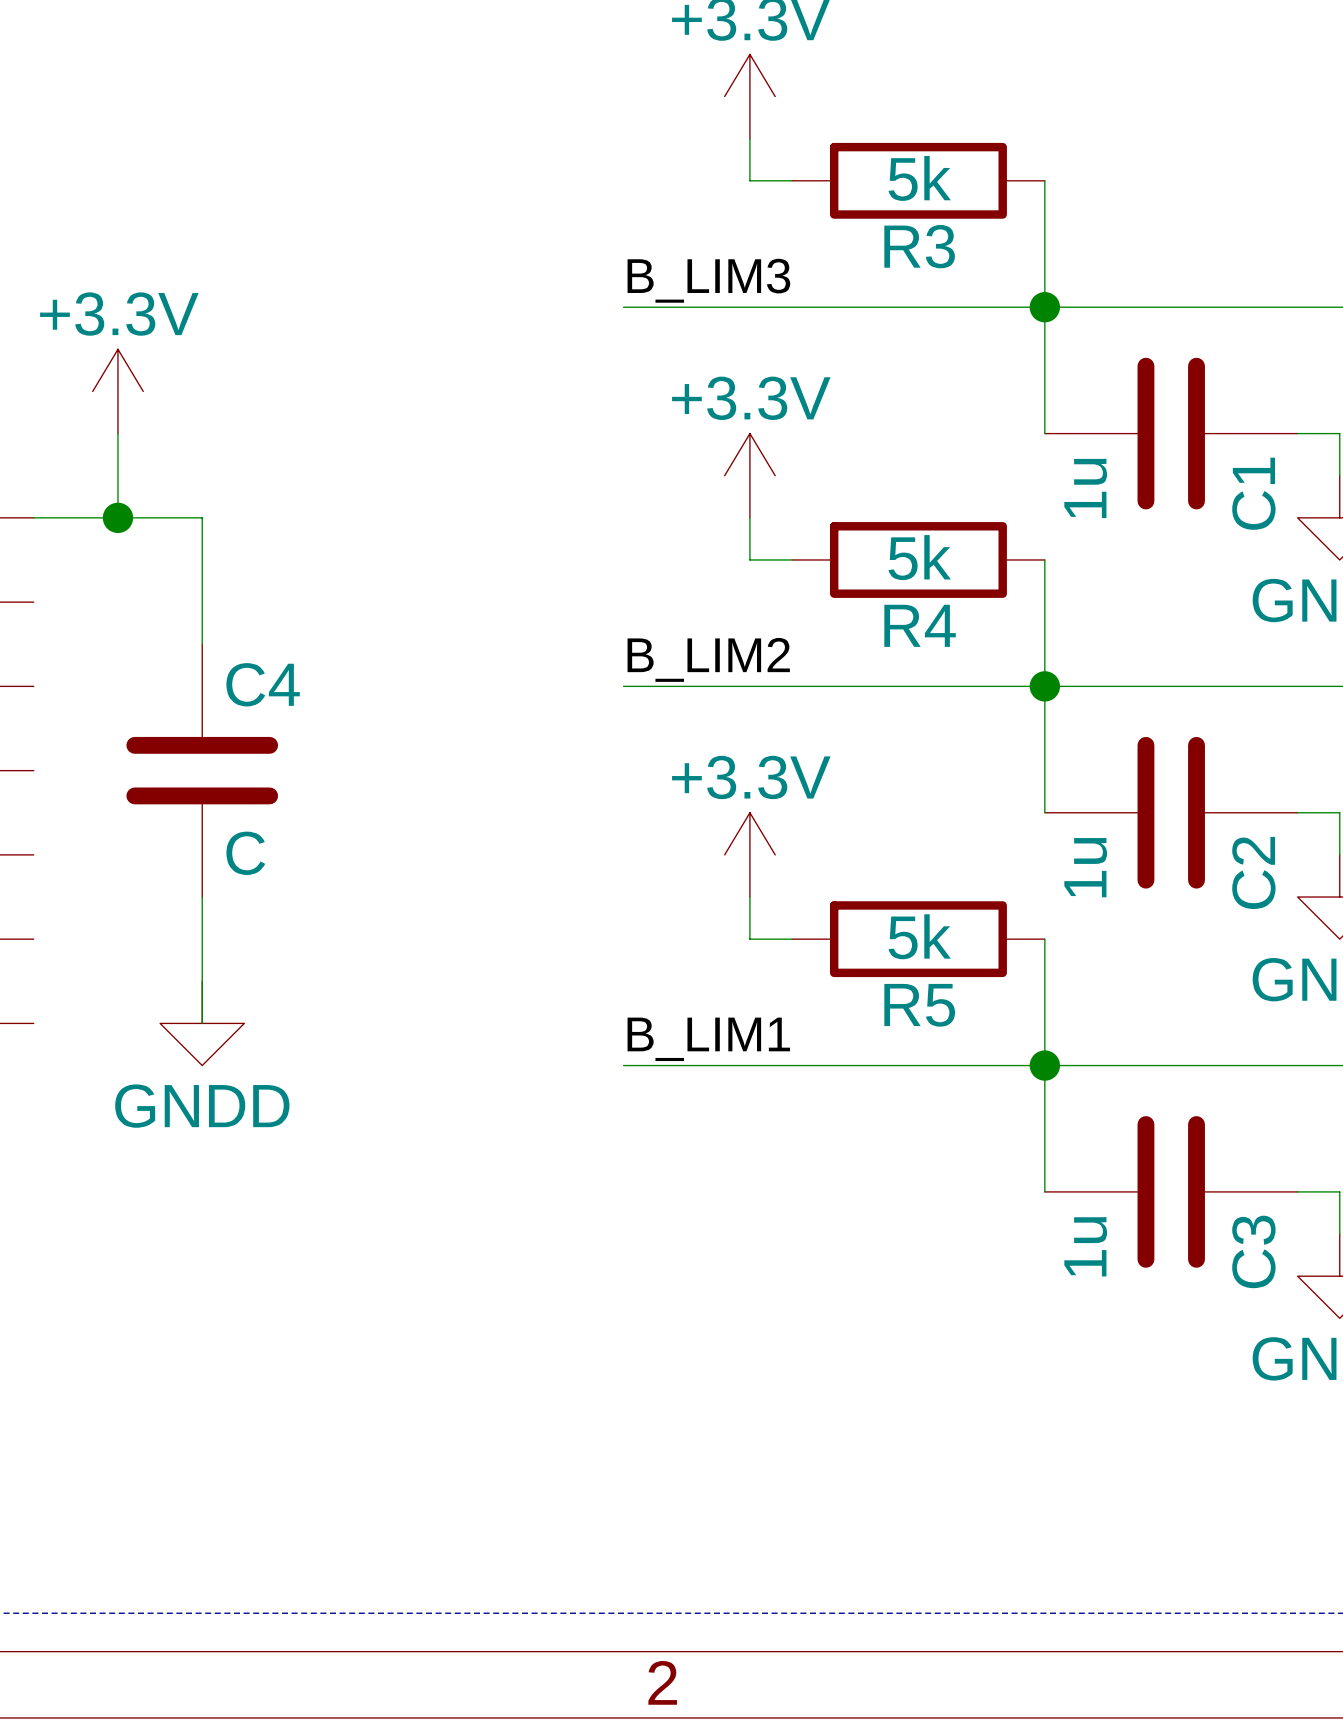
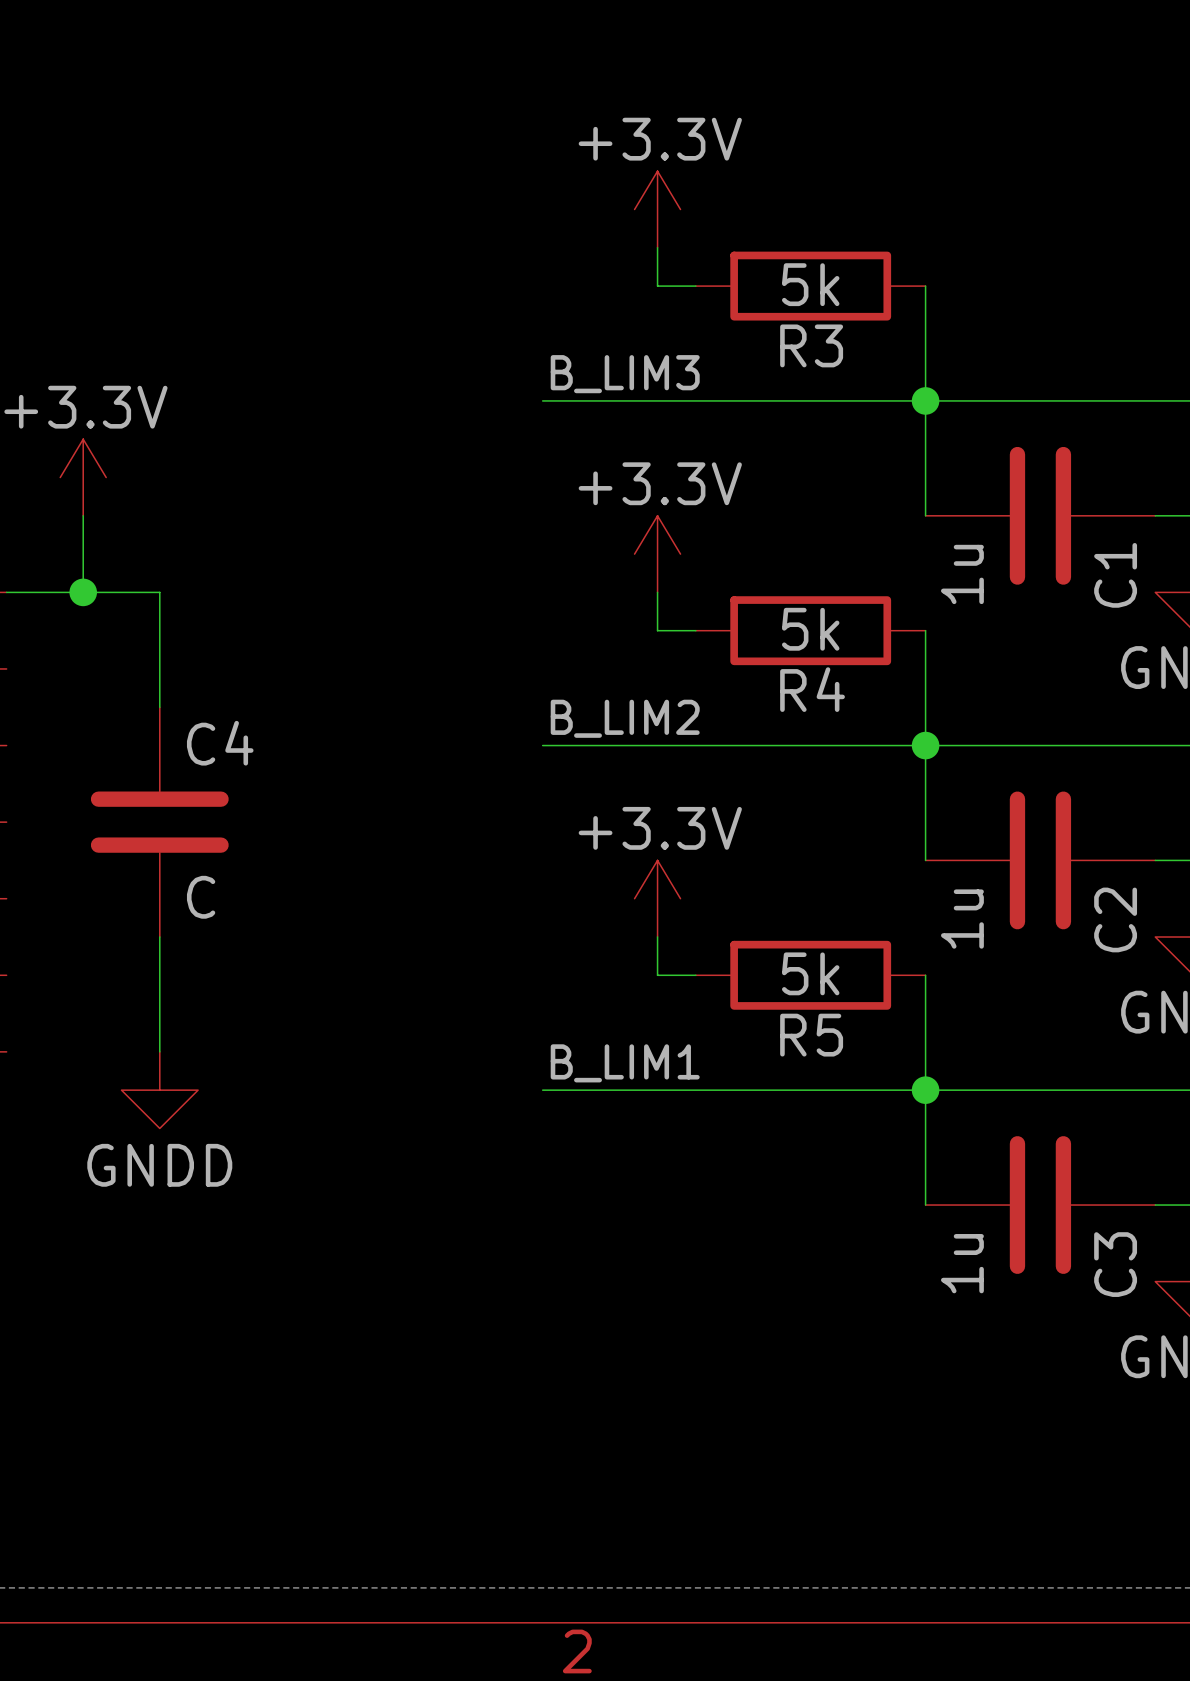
power symbol position: GNDD (202, 1023) -> GNDD (159, 1090)

